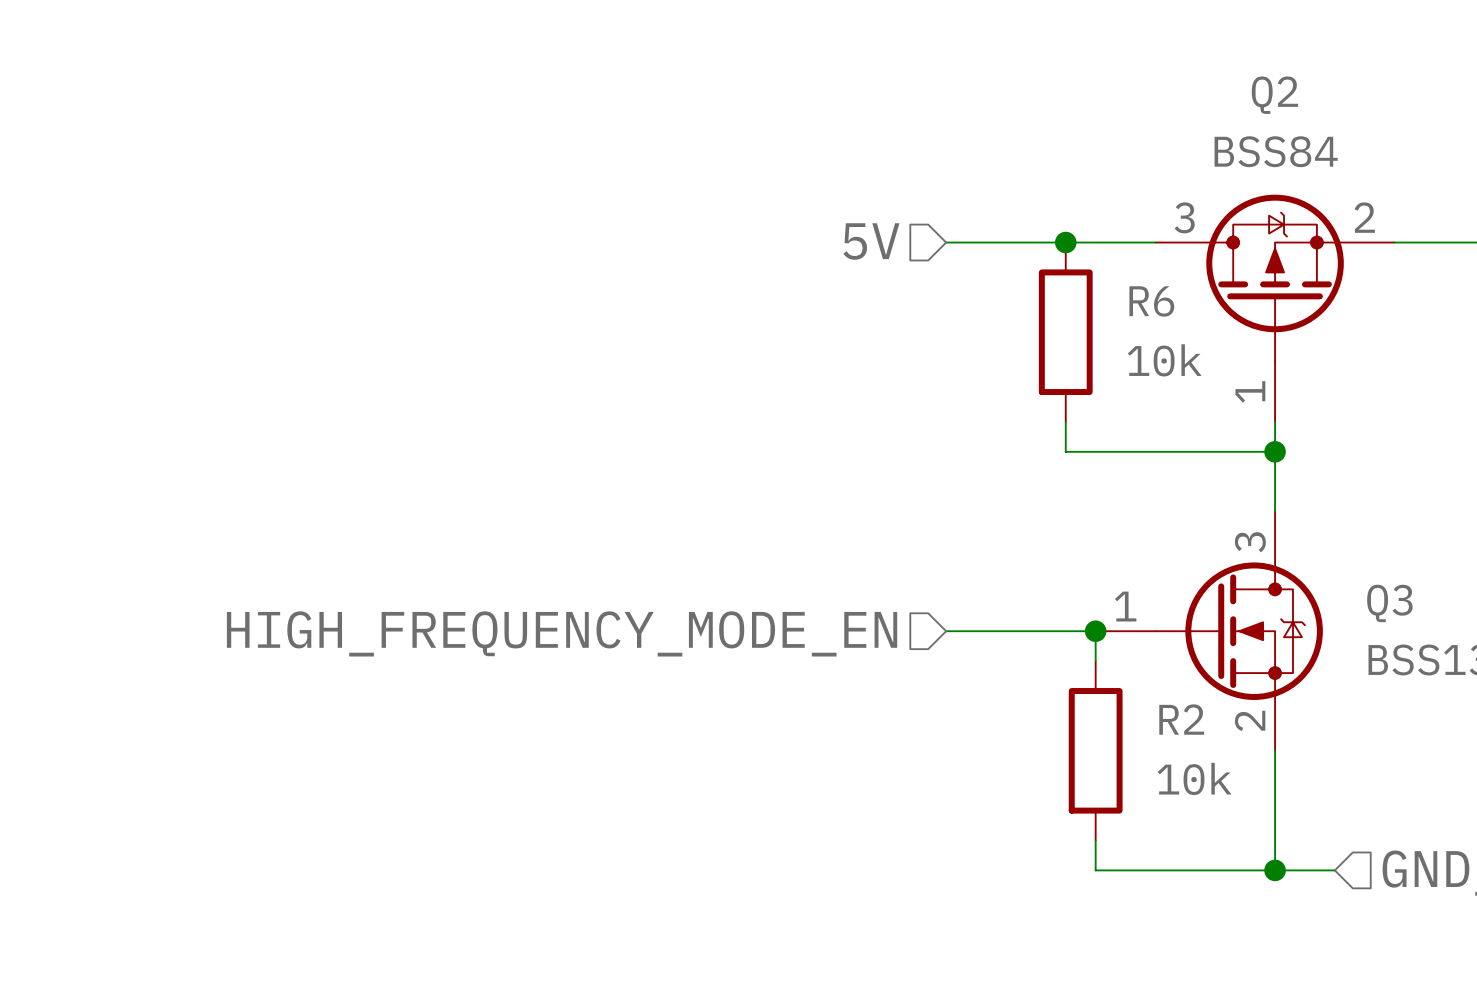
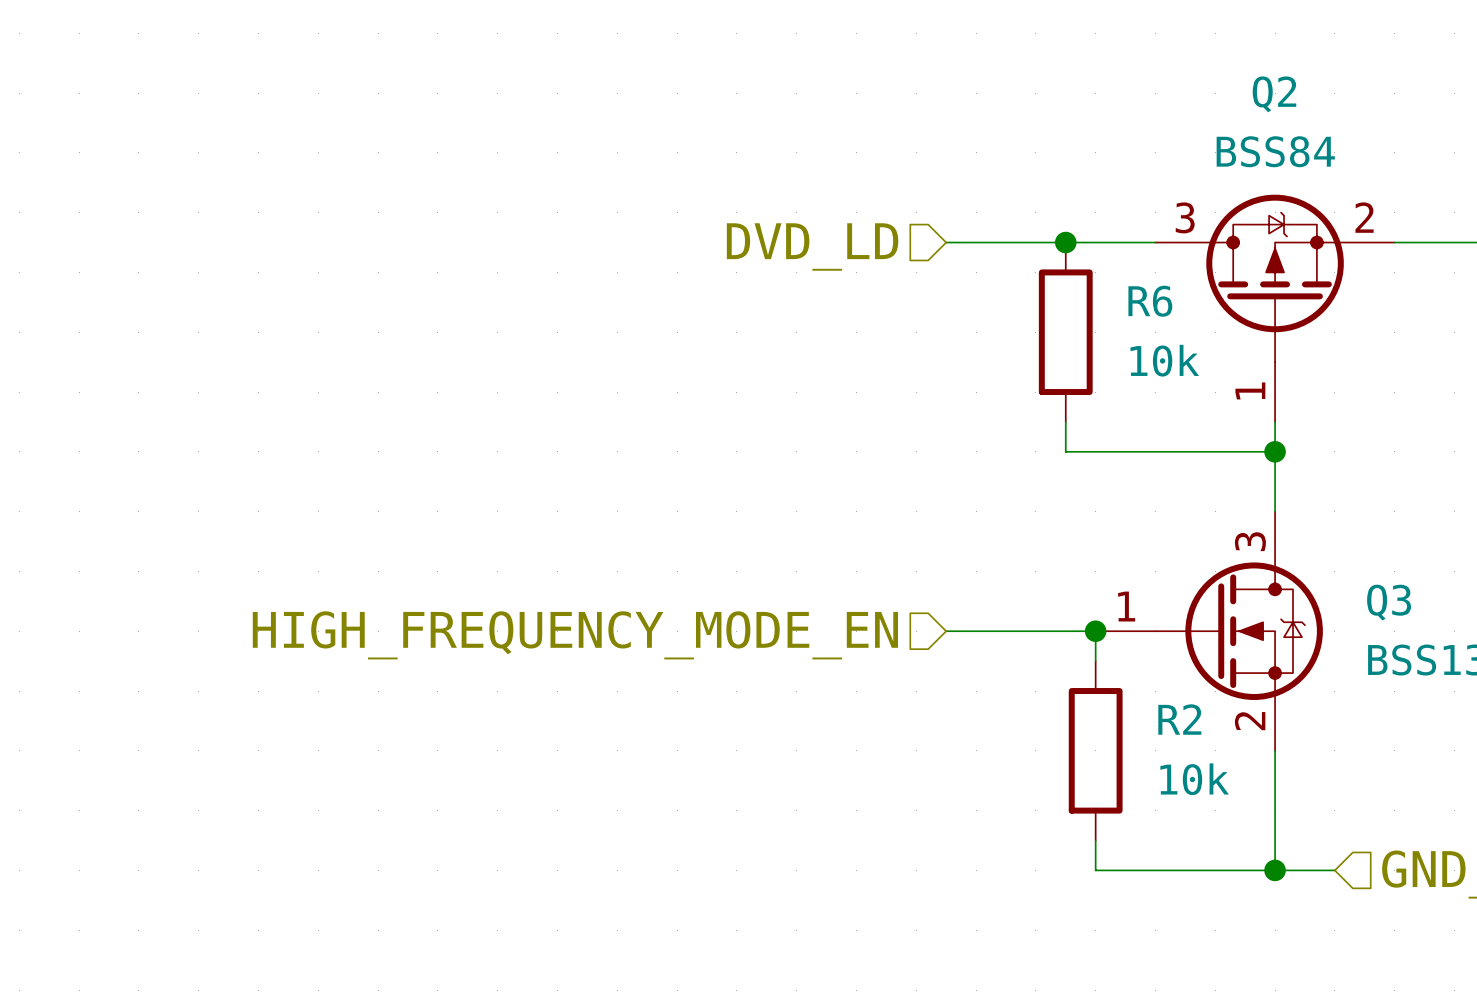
hierarchical label: 5V (871, 241) -> DVD_LD (812, 246)

